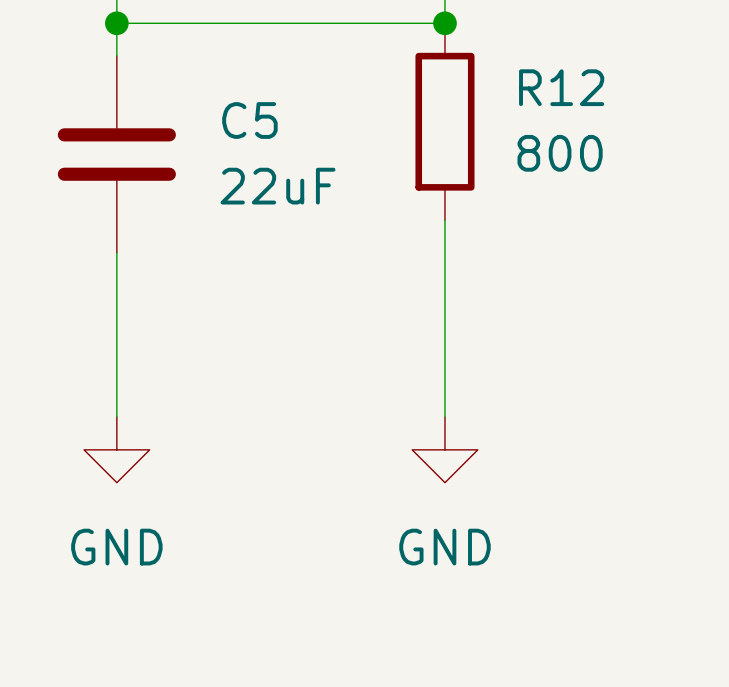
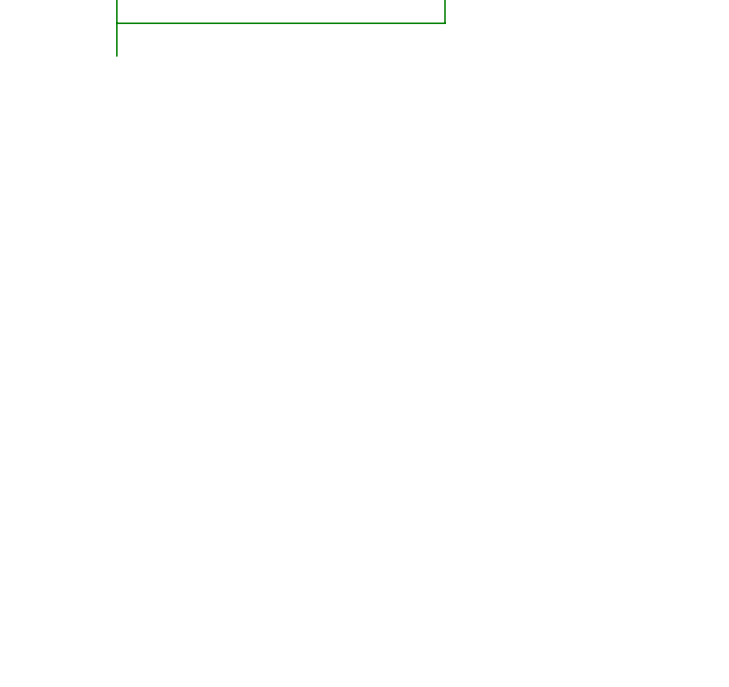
junction: (116, 23) -> none
junction: (444, 23) -> none
R12: 800 (444, 121) -> none
C5: 22uF (116, 154) -> none
wire: (444, 220) (444, 417) -> none
wire: (116, 252) (116, 417) -> none
power symbol: GND (116, 449) -> none
power symbol: GND (444, 449) -> none

